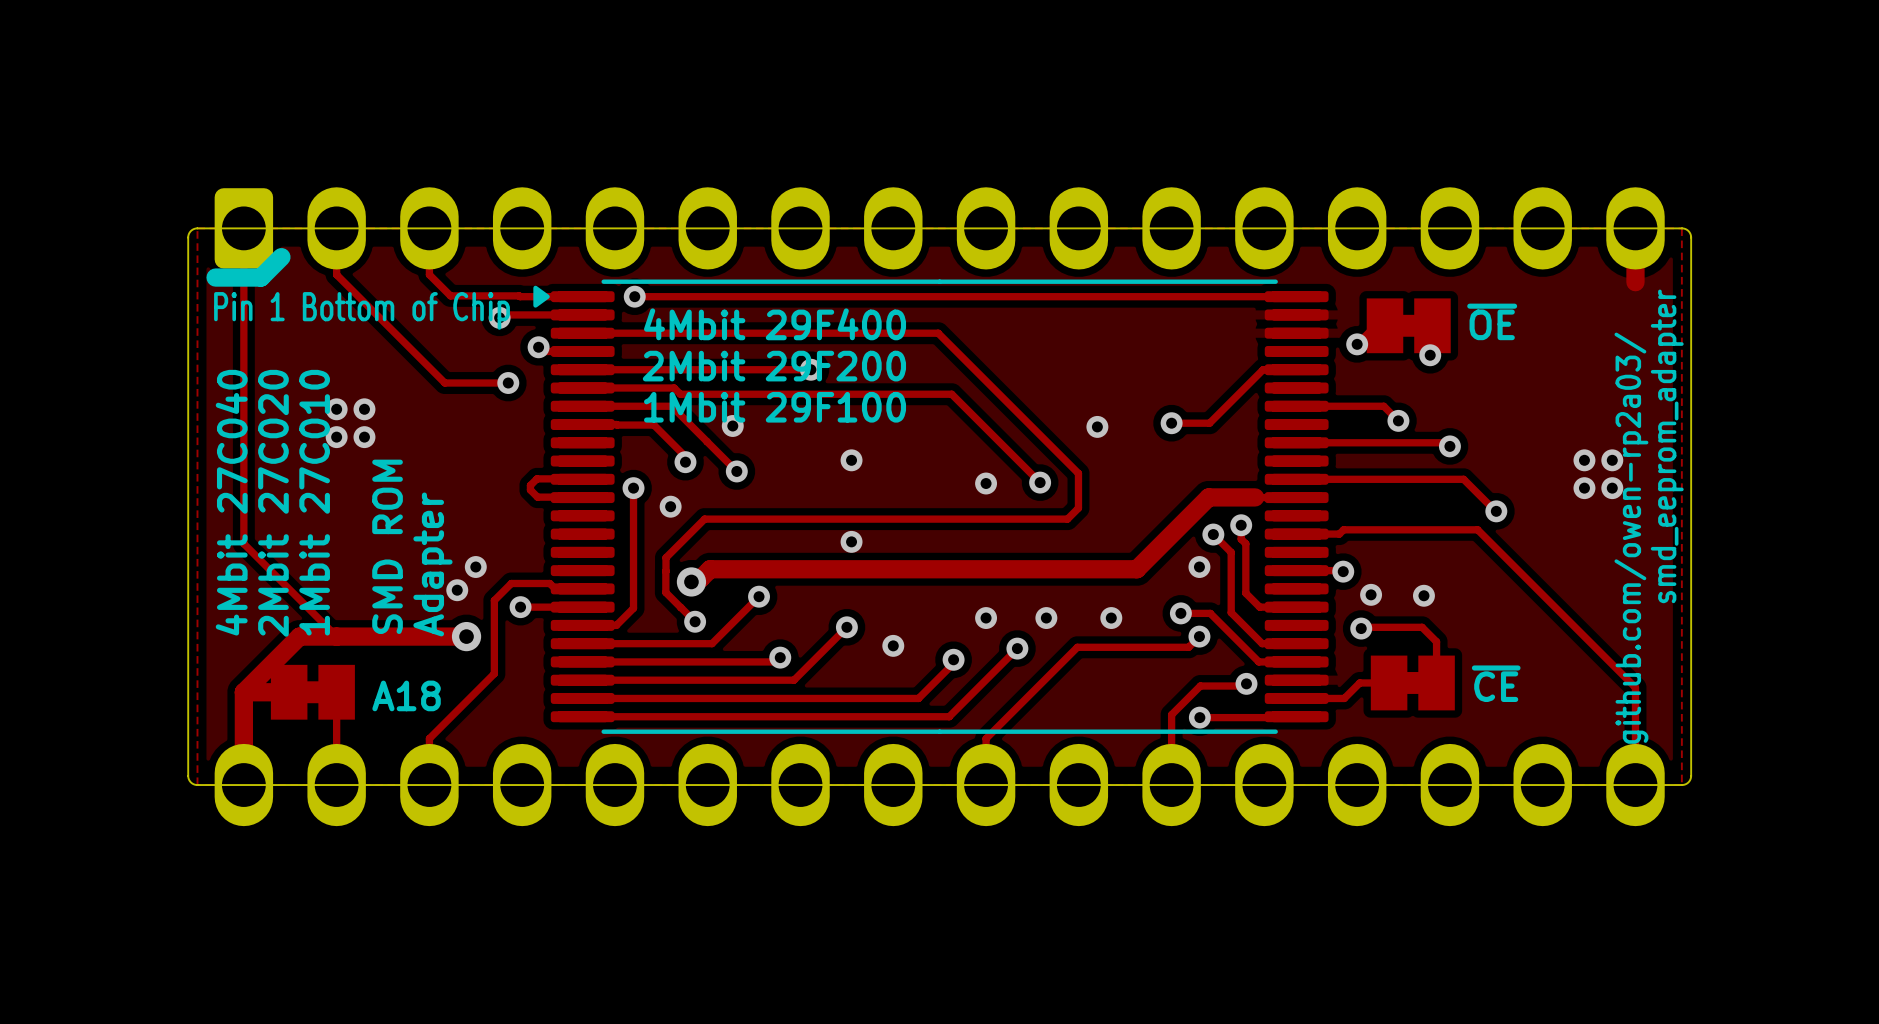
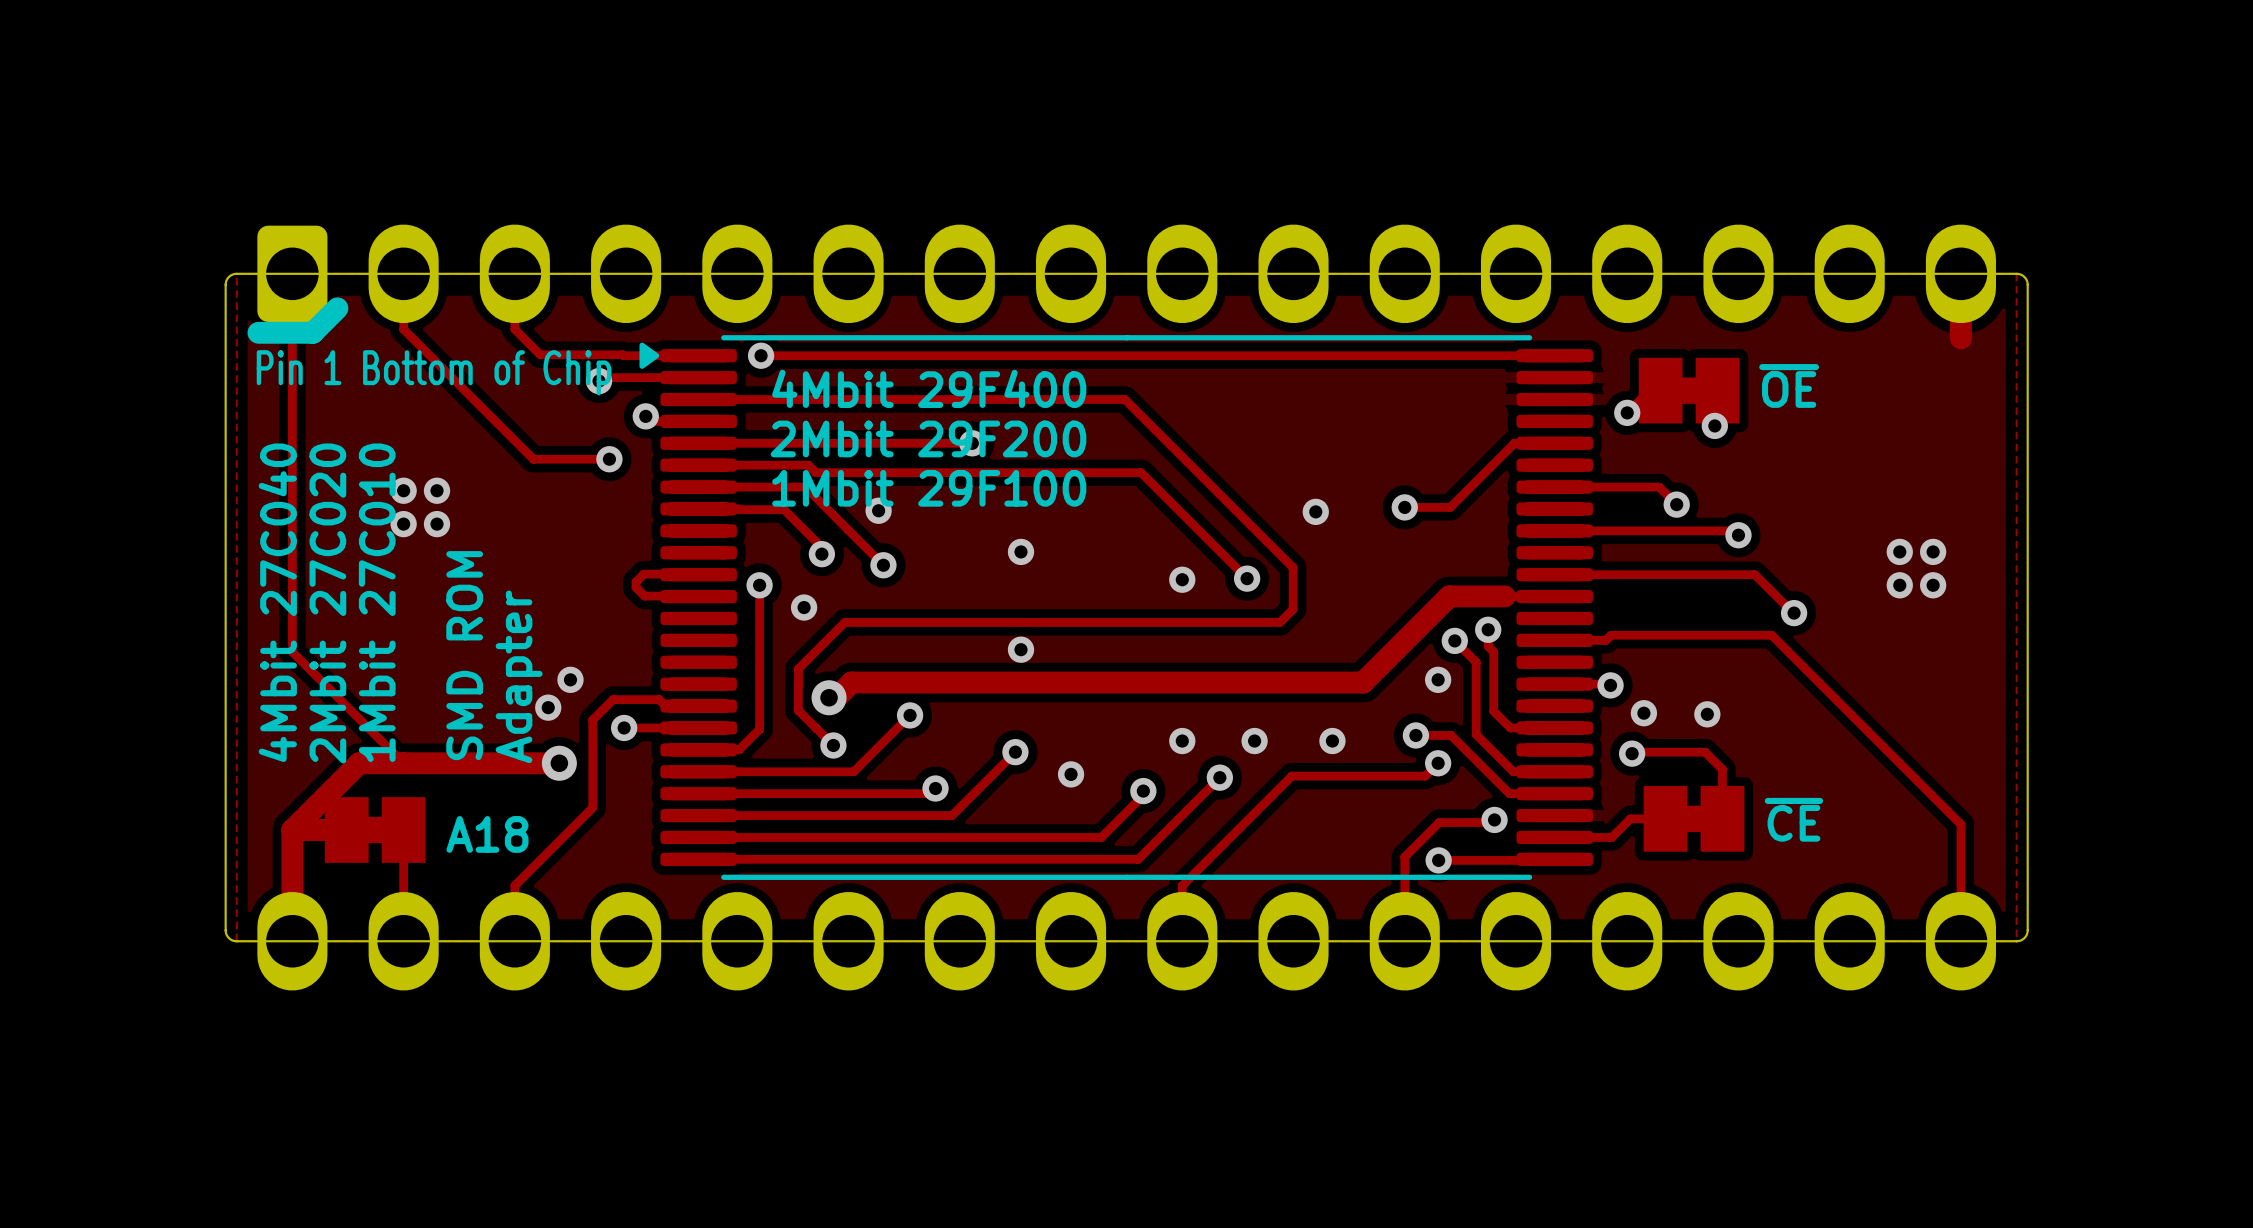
text: smd_eeprom_adapter (1667, 446) -> none
text: github.com/owen-rp2a03/ (1631, 538) -> none

